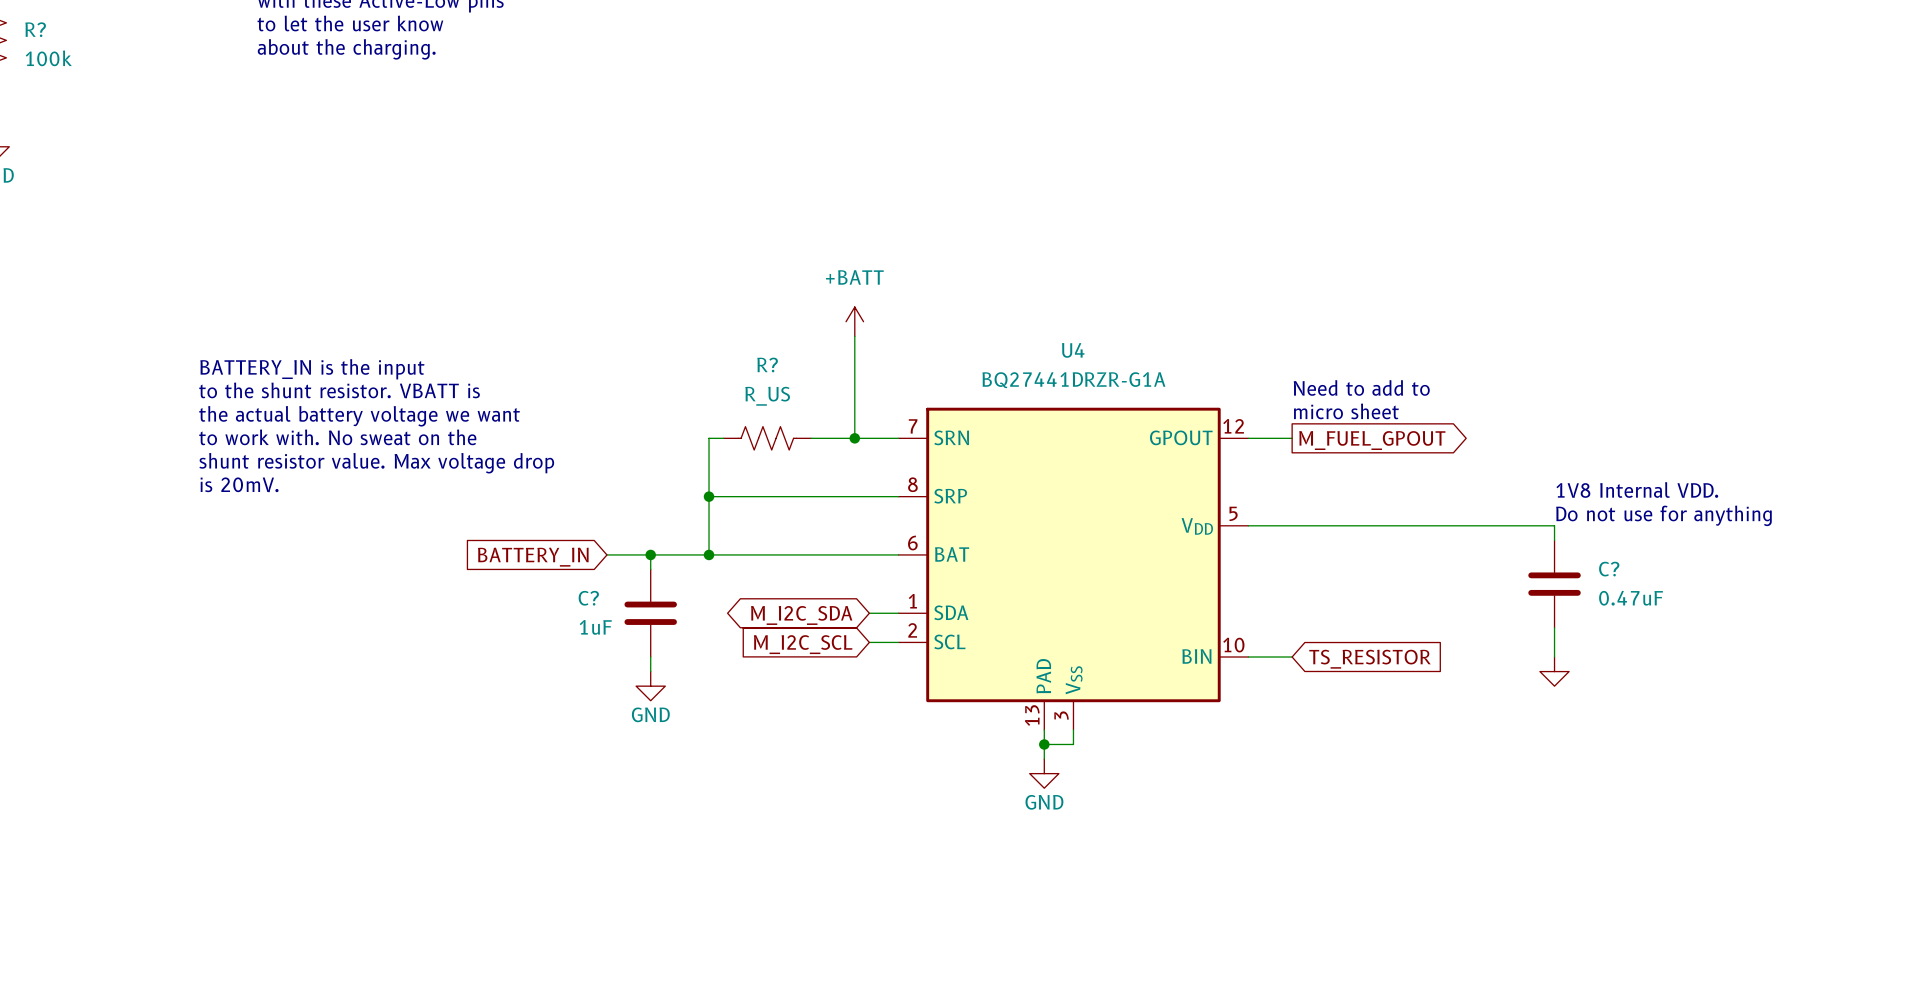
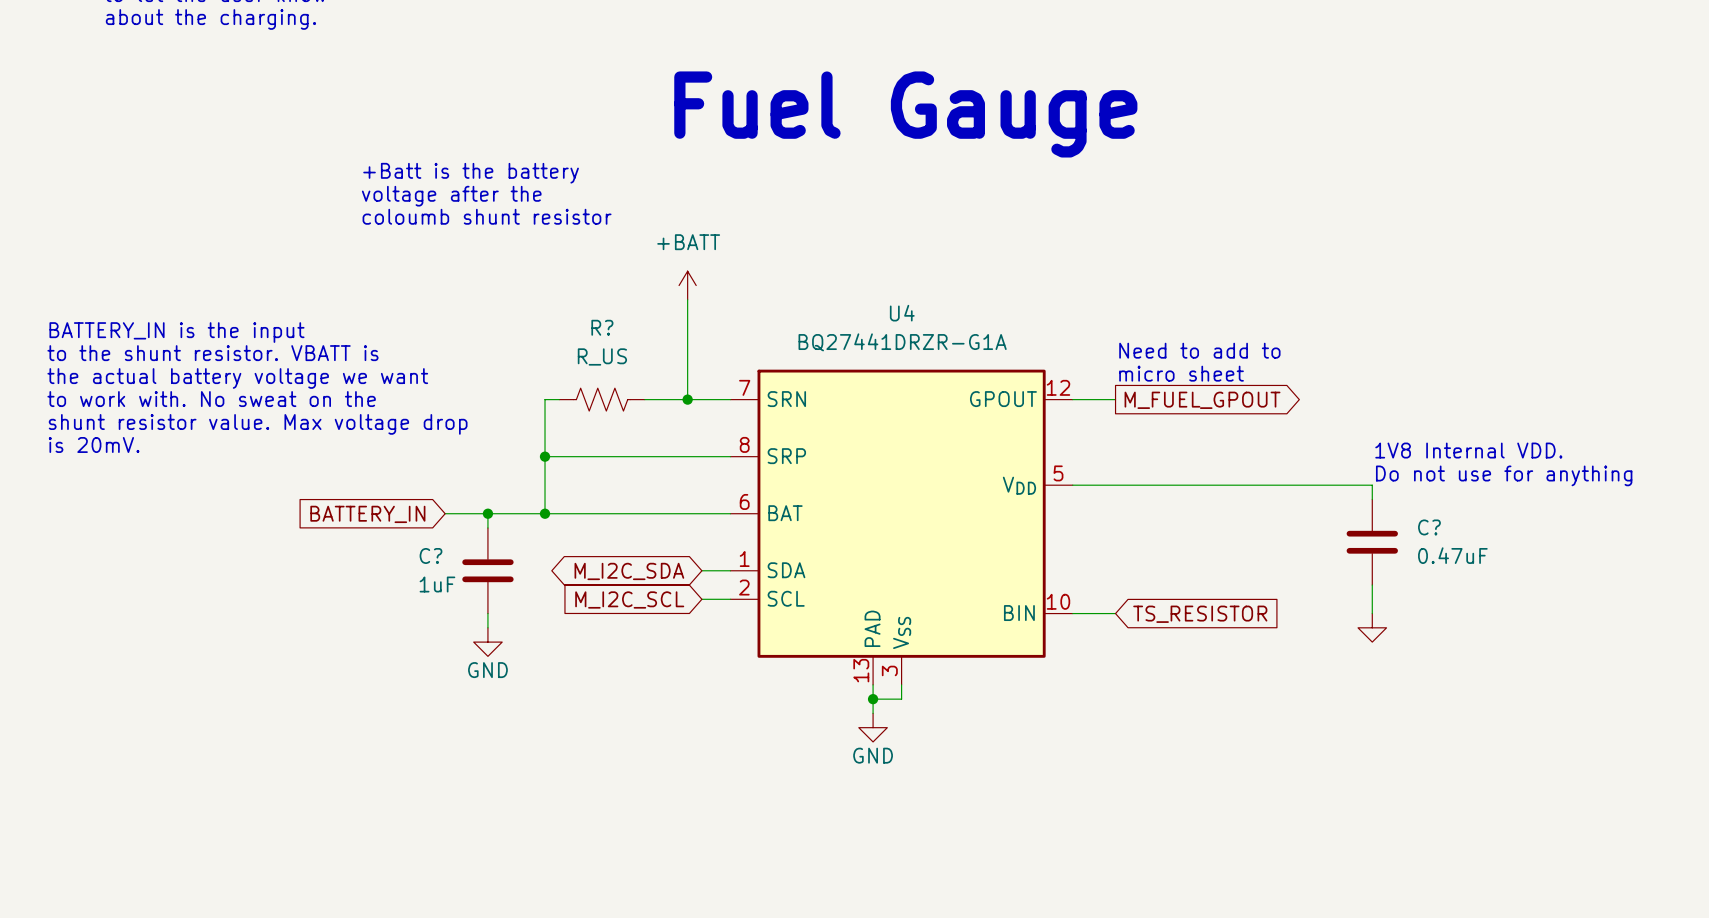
text: none -> Fuel Gauge (905, 114)
text: none -> +Batt is the battery (471, 173)
text: none -> voltage after the (451, 196)
text: none -> coloumb shunt resistor (487, 216)

